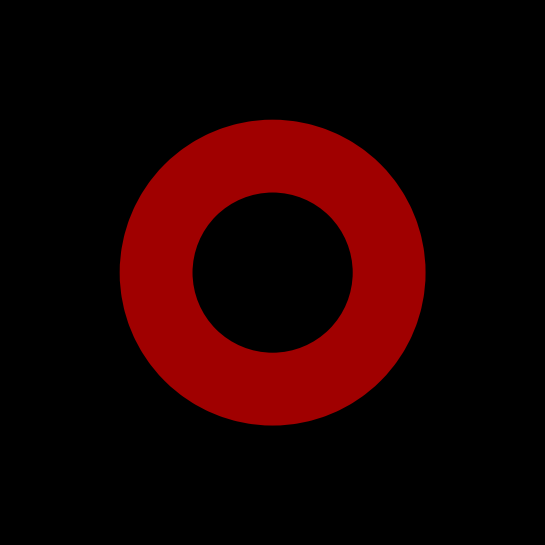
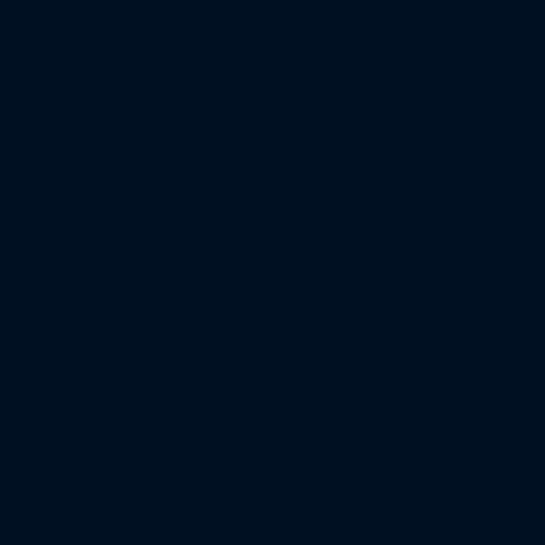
drawing: [119, 119, 426, 426] -> none

